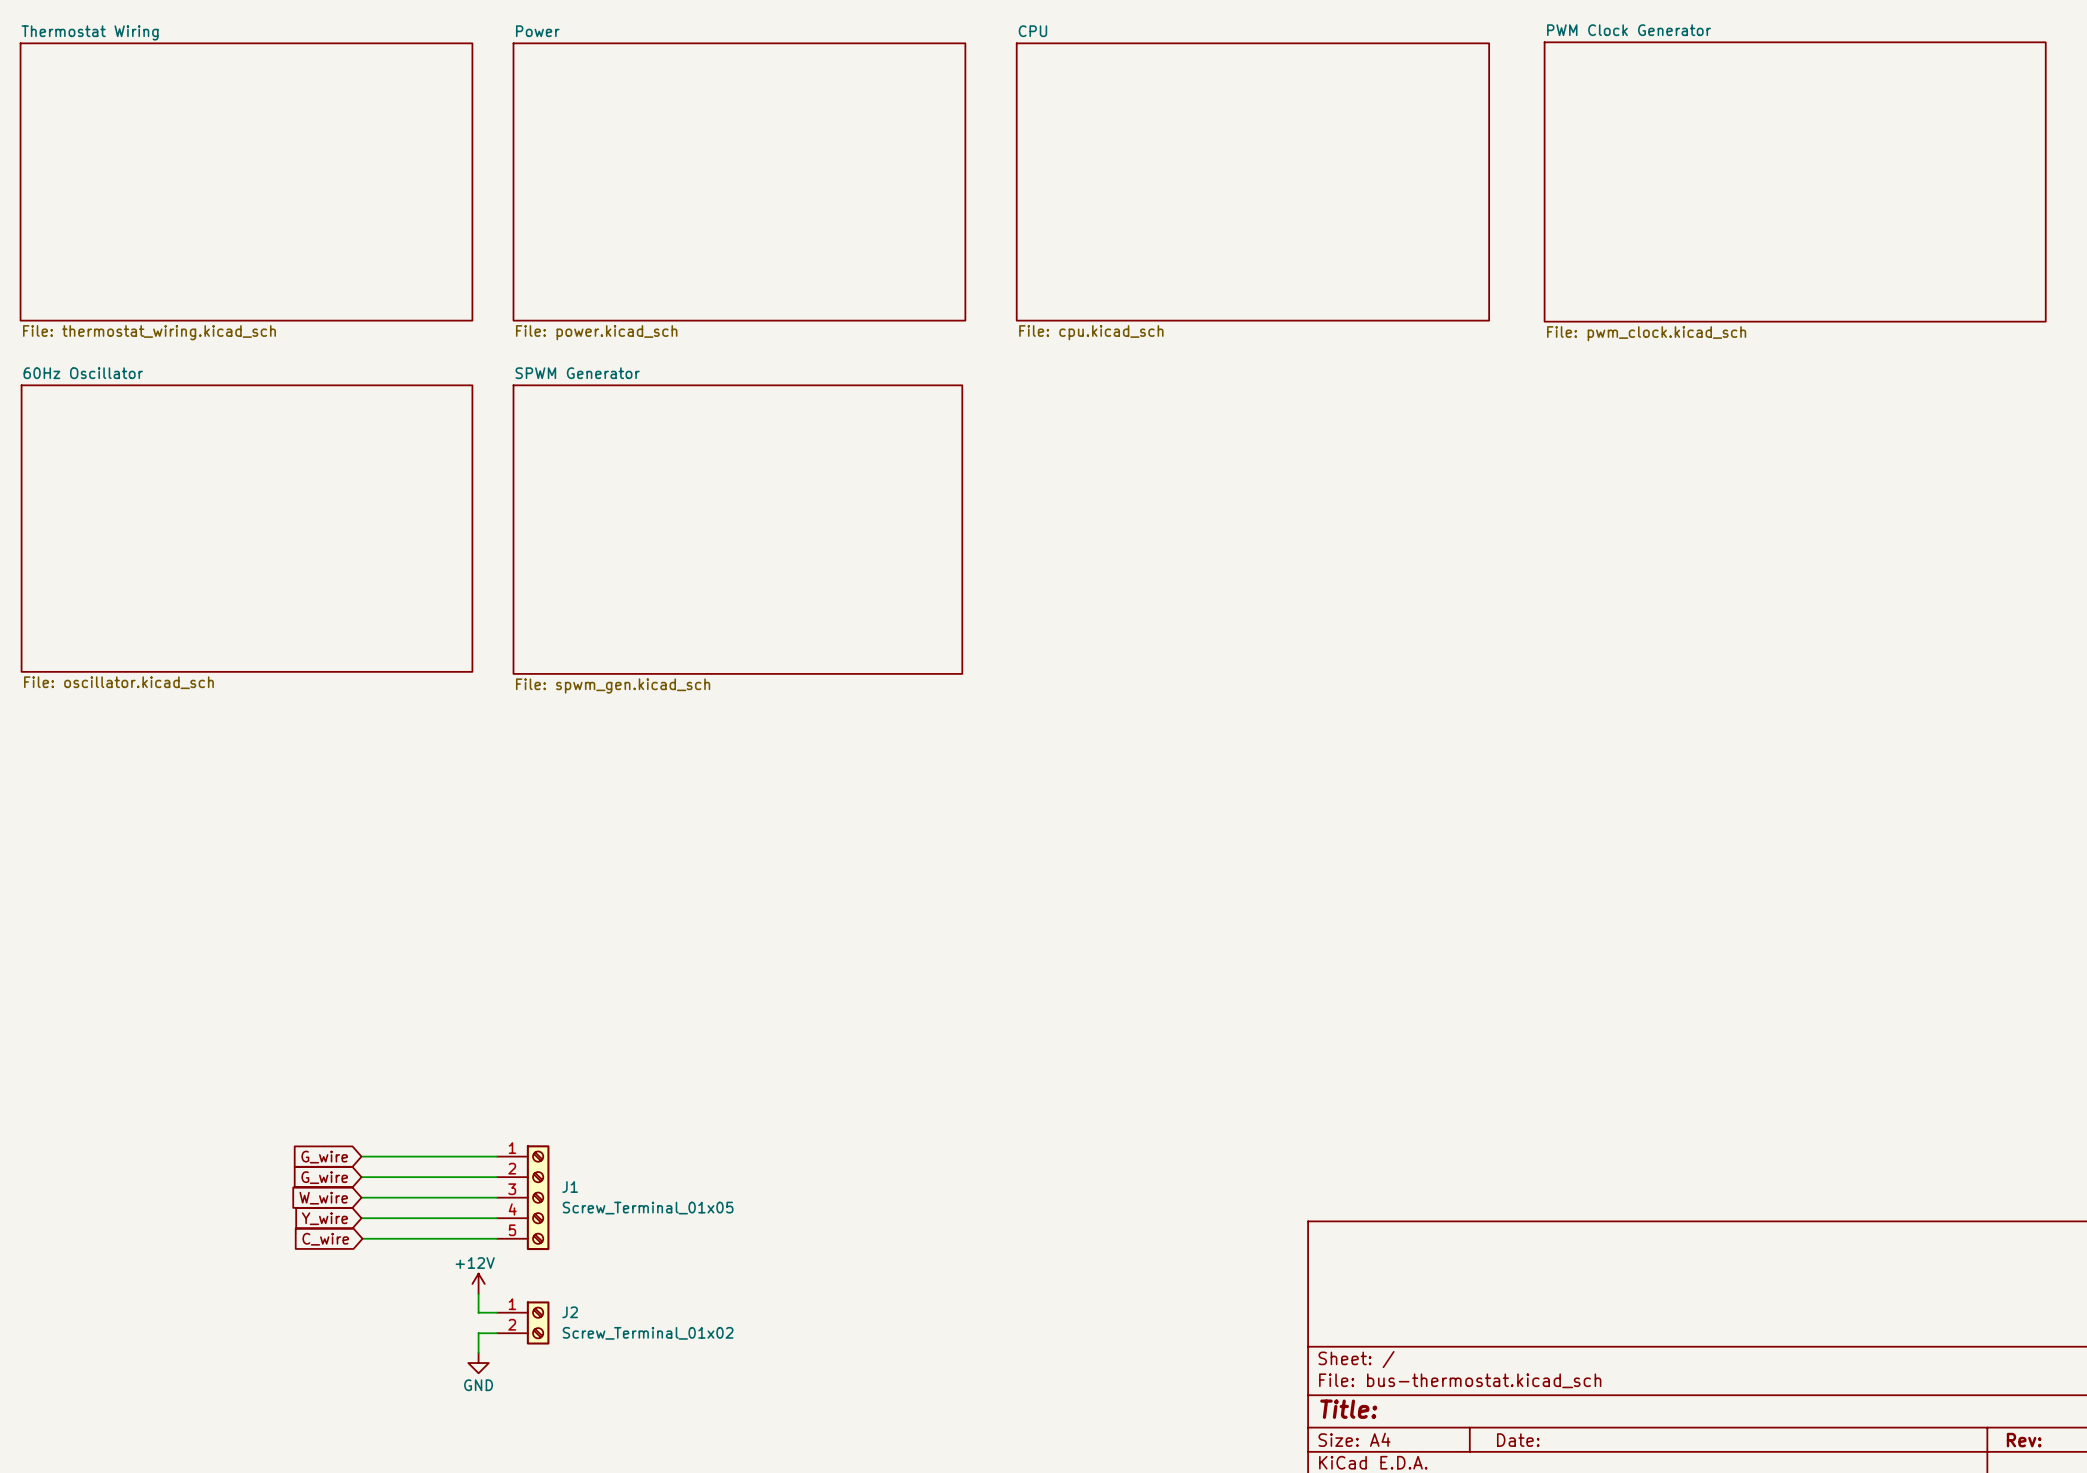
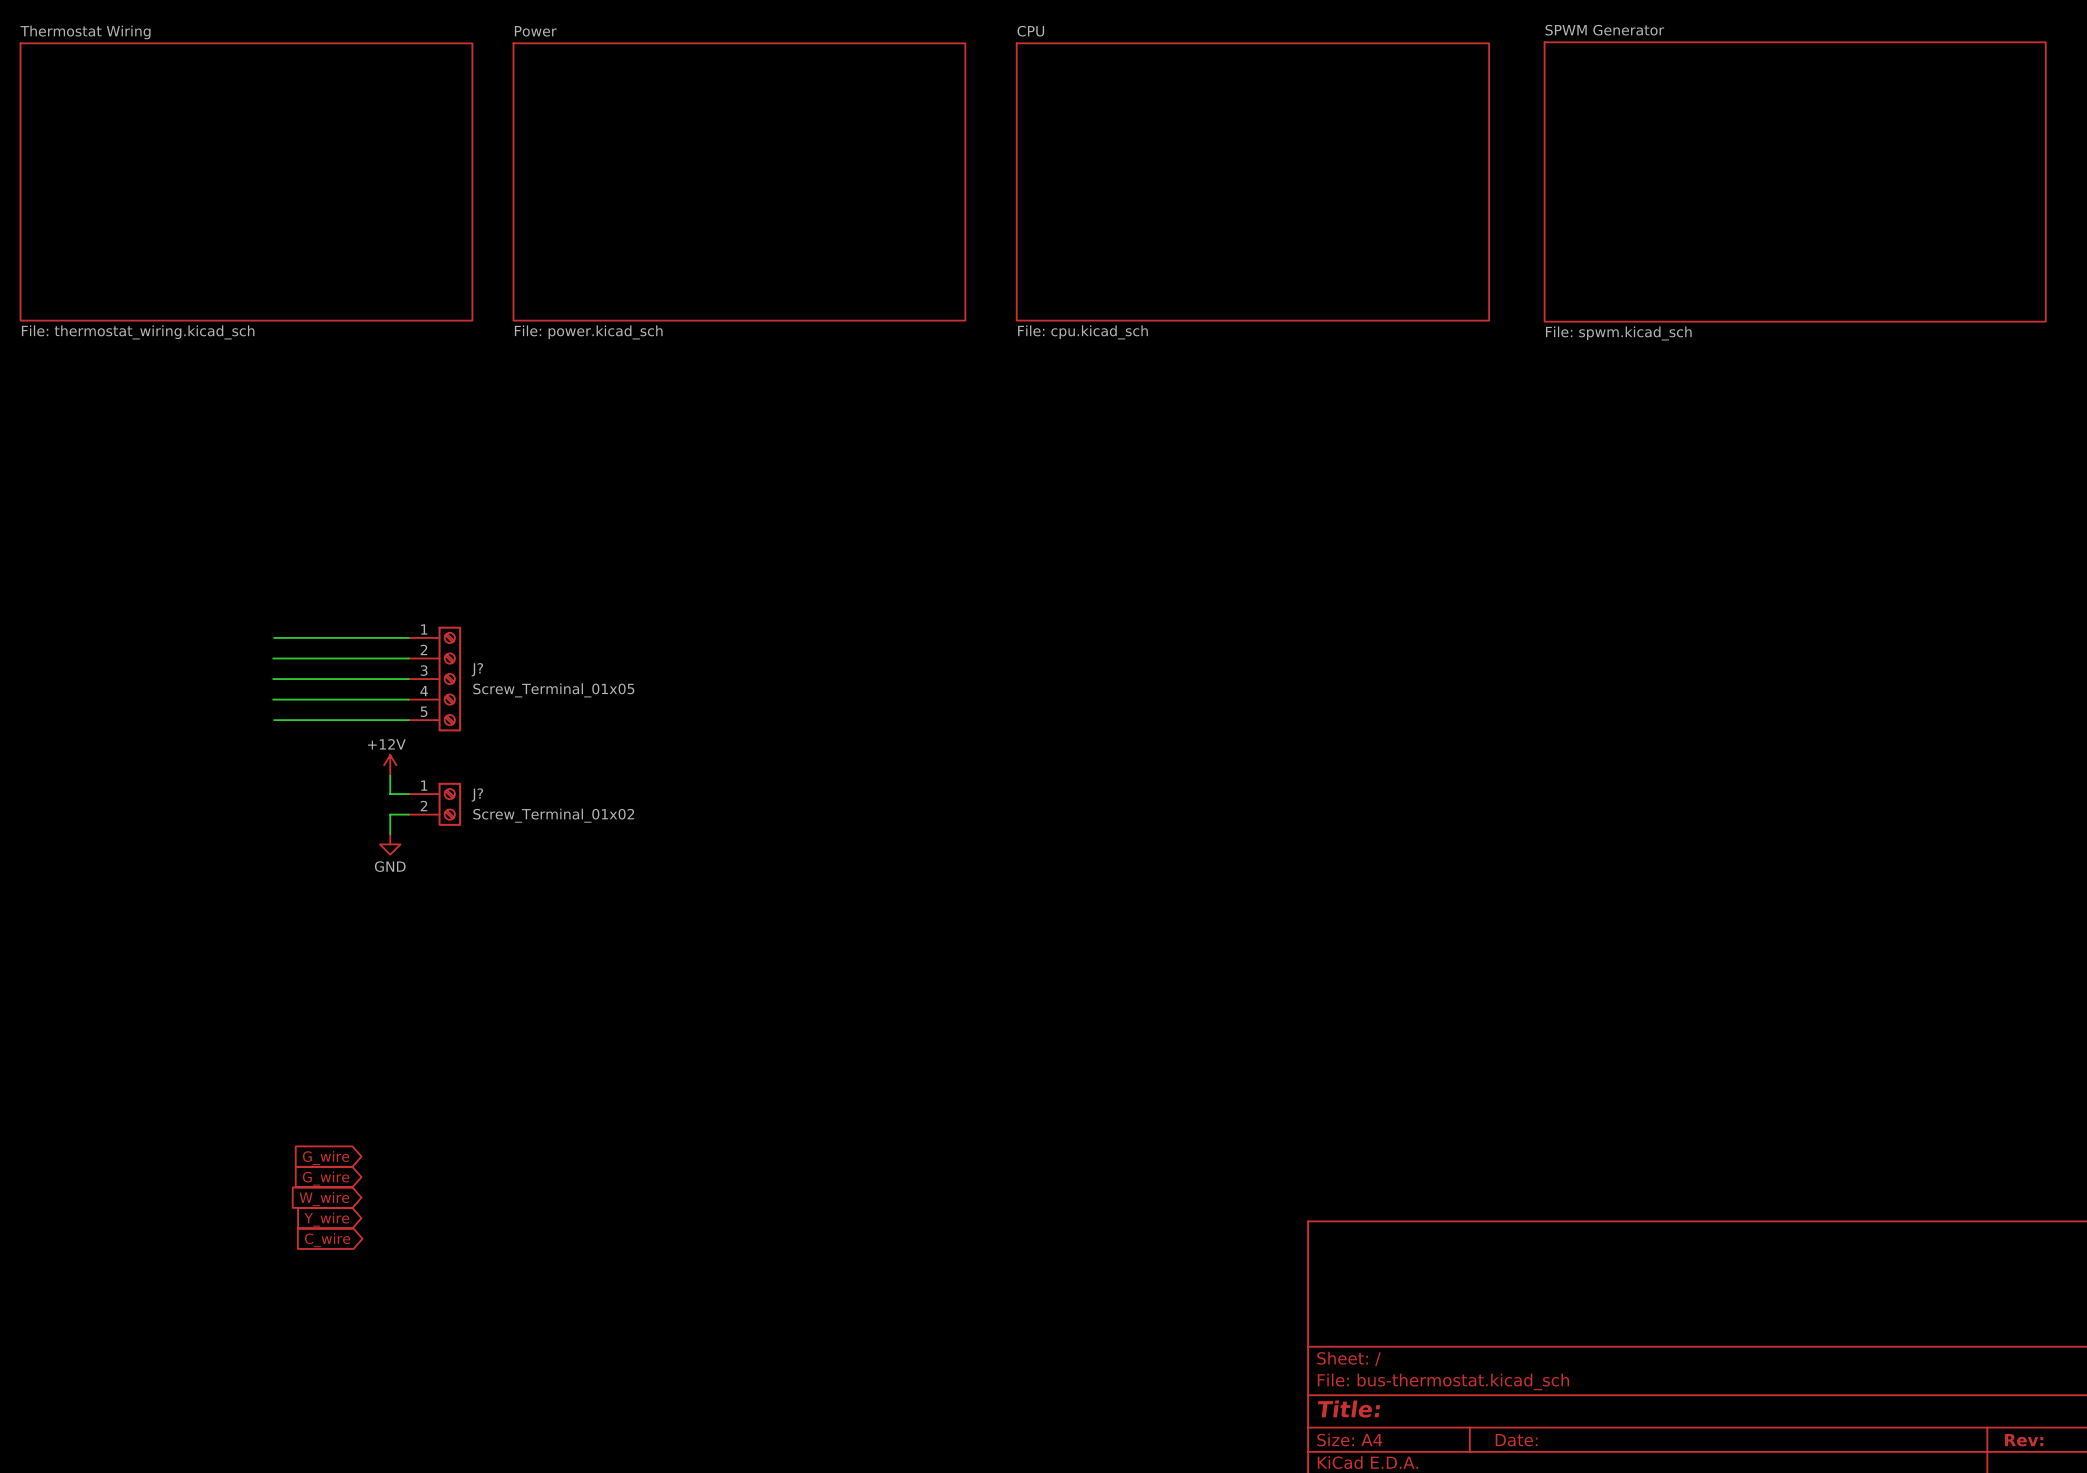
sheet PWM Clock Generator name: PWM Clock Generator (1629, 30) -> SPWM Generator (1604, 30)
sheet PWM Clock Generator value: File: pwm_clock.kicad_sch (1646, 333) -> File: spwm.kicad_sch (1618, 333)
sheet 60Hz Oscillator: File: oscillator.kicad_sch (246, 528) -> none
sheet SPWM Generator: File: spwm_gen.kicad_sch (737, 529) -> none
wire: none -> (274, 637) (408, 637)
wire: none -> (273, 658) (408, 658)
wire: none -> (273, 679) (408, 679)
J?: none -> Screw_Terminal_01x05 (434, 679)
wire: none -> (273, 699) (408, 699)
wire: none -> (274, 720) (408, 720)
power symbol: none -> +12V (390, 765)
wire: none -> (390, 775) (390, 794) (408, 794)
J?: none -> Screw_Terminal_01x02 (434, 804)
wire: none -> (408, 814) (390, 814) (390, 834)
power symbol: none -> GND (390, 844)
wire: (362, 1156) (497, 1156) -> none
wire: (361, 1177) (497, 1177) -> none
wire: (361, 1197) (497, 1197) -> none
J1: Screw_Terminal_01x05 (523, 1197) -> none
wire: (361, 1218) (497, 1218) -> none
wire: (362, 1238) (497, 1238) -> none
power symbol: +12V (478, 1283) -> none
wire: (478, 1294) (478, 1312) (497, 1312) -> none
J2: Screw_Terminal_01x02 (523, 1322) -> none
wire: (497, 1333) (478, 1333) (478, 1352) -> none
power symbol: GND (478, 1363) -> none

